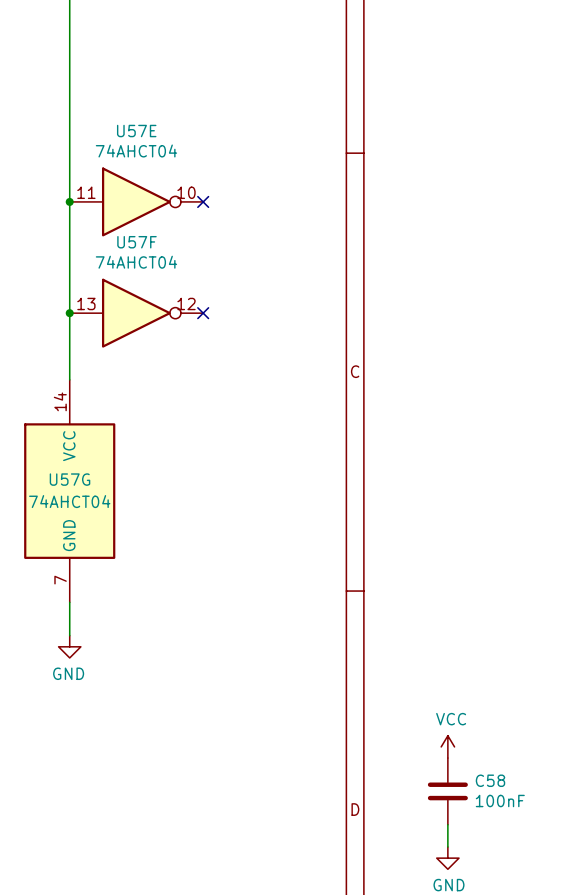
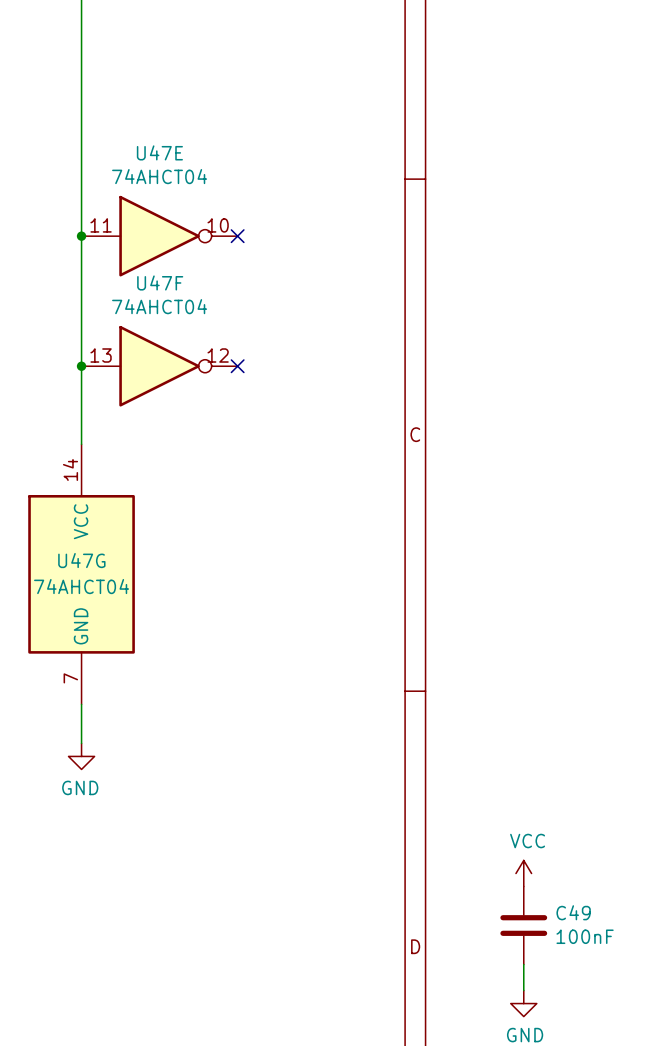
U57E name: U57E (136, 131) -> U47E (159, 152)
U57F name: U57F (136, 242) -> U47F (160, 282)
U57G name: U57G (69, 479) -> U47G (81, 560)
C58 name: C58 (490, 780) -> C49 (573, 912)

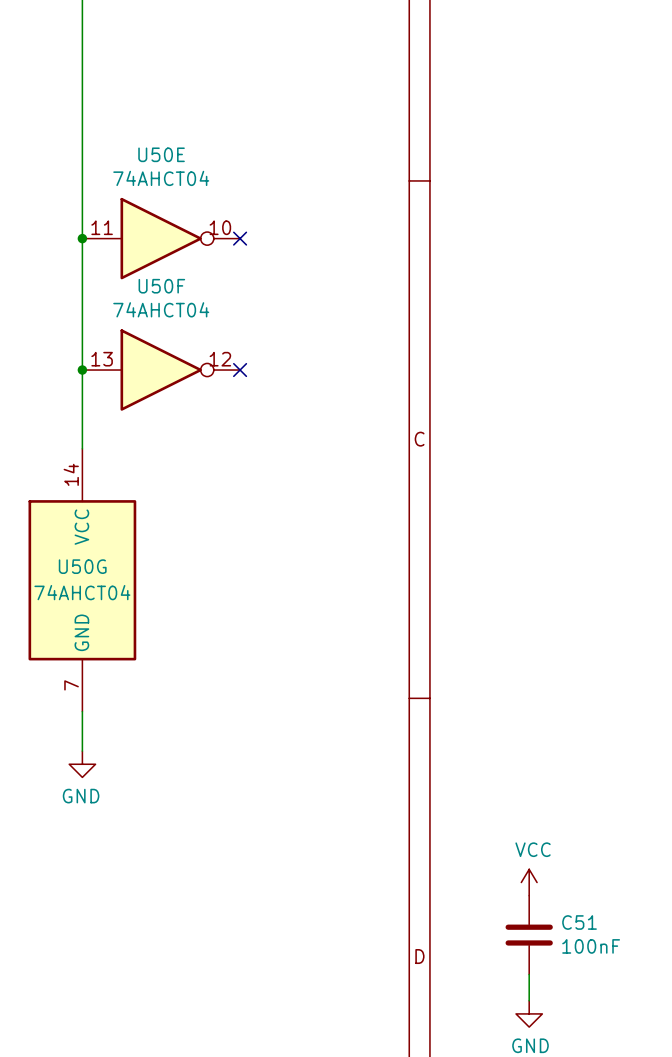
U47E name: U47E (159, 152) -> U50E (161, 154)
U47F name: U47F (160, 282) -> U50F (161, 286)
U47G name: U47G (81, 560) -> U50G (82, 566)
C49 name: C49 (573, 912) -> C51 (579, 922)

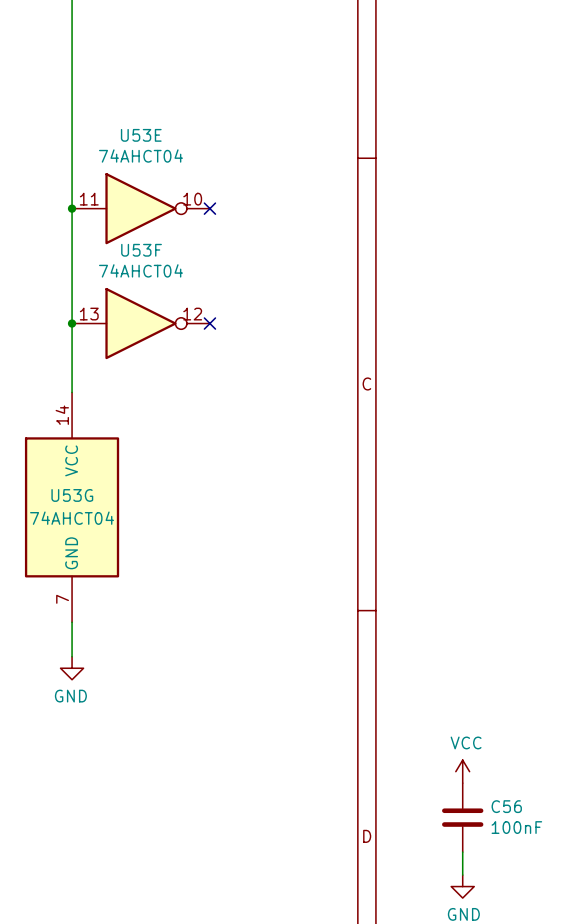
U50E name: U50E (161, 154) -> U53E (141, 135)
U50F name: U50F (161, 286) -> U53F (141, 250)
U50G name: U50G (82, 566) -> U53G (72, 495)
C51 name: C51 (579, 922) -> C56 (506, 806)

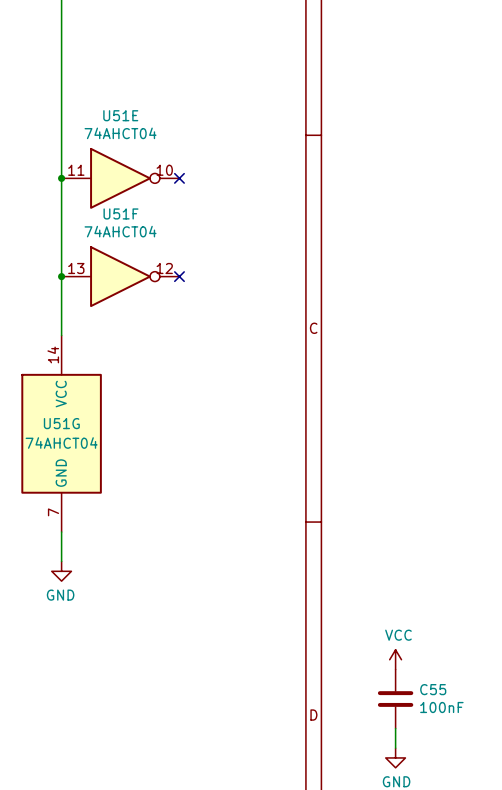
U53E name: U53E (141, 135) -> U51E (120, 115)
U53F name: U53F (141, 250) -> U51F (121, 213)
U53G name: U53G (72, 495) -> U51G (61, 423)
C56 name: C56 (506, 806) -> C55 (433, 689)

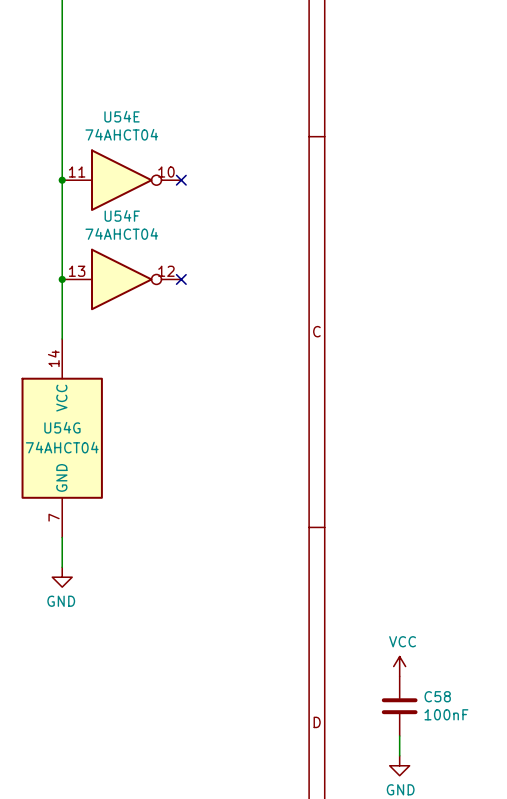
U51E name: U51E (120, 115) -> U54E (122, 116)
U51F name: U51F (121, 213) -> U54F (122, 215)
U51G name: U51G (61, 423) -> U54G (62, 427)
C55 name: C55 (433, 689) -> C58 (437, 696)

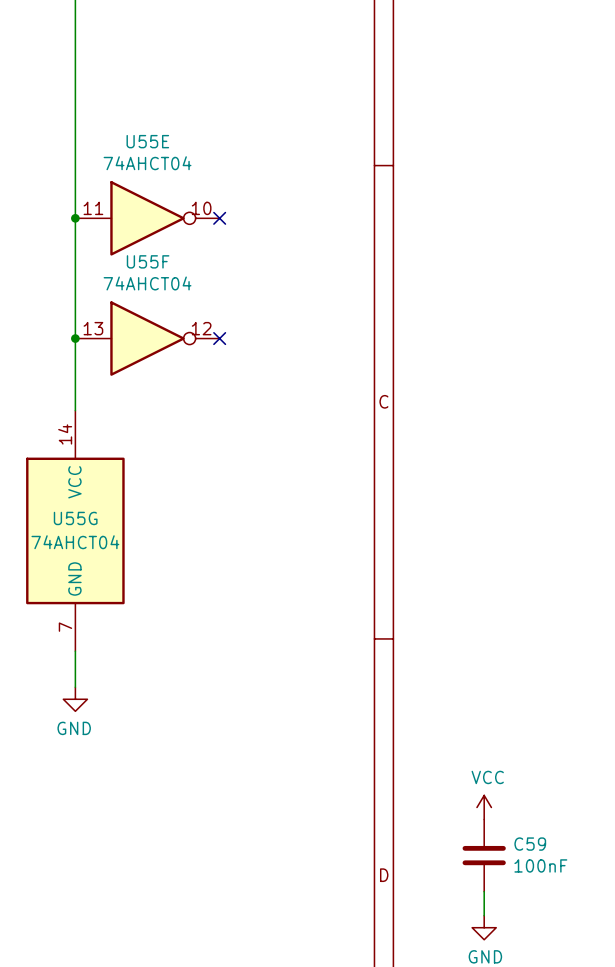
U54E name: U54E (122, 116) -> U55E (147, 141)
U54F name: U54F (122, 215) -> U55F (148, 261)
U54G name: U54G (62, 427) -> U55G (75, 518)
C58 name: C58 (437, 696) -> C59 (530, 844)

